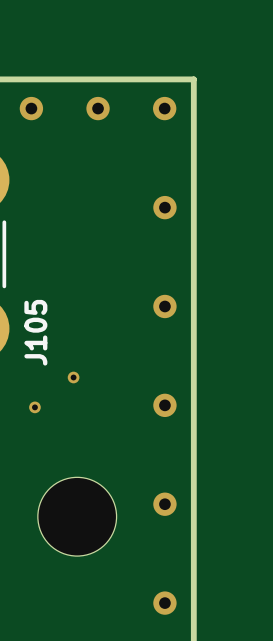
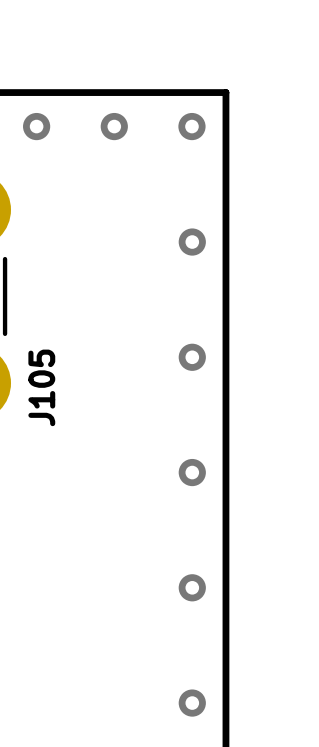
via: (73, 377) -> none
via: (34, 407) -> none
part: (77, 516) -> none

